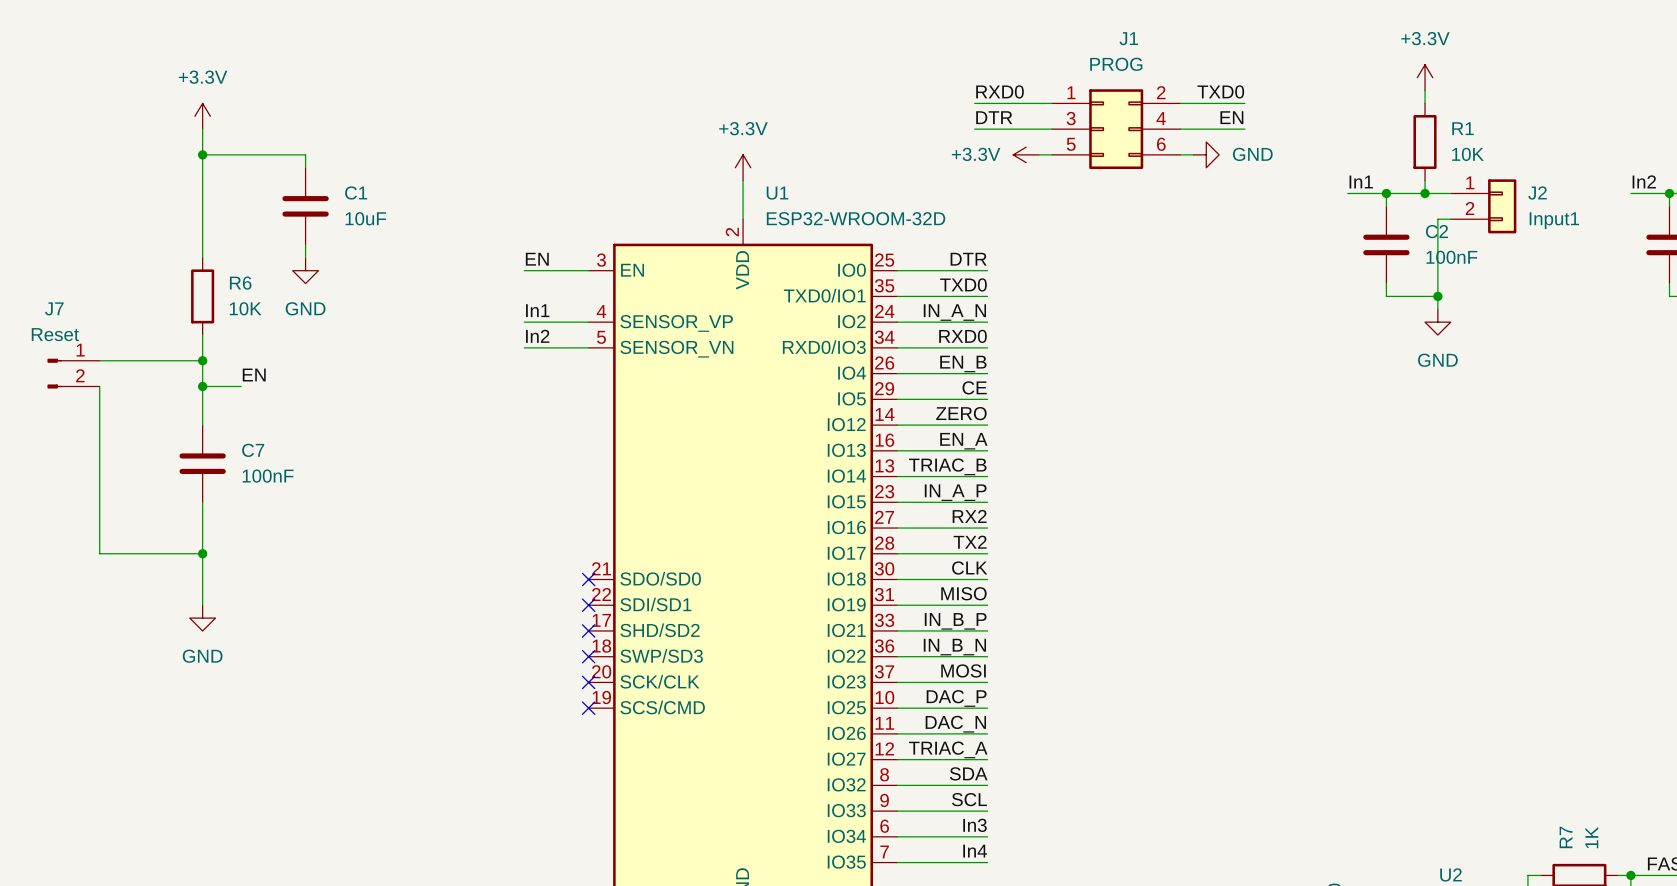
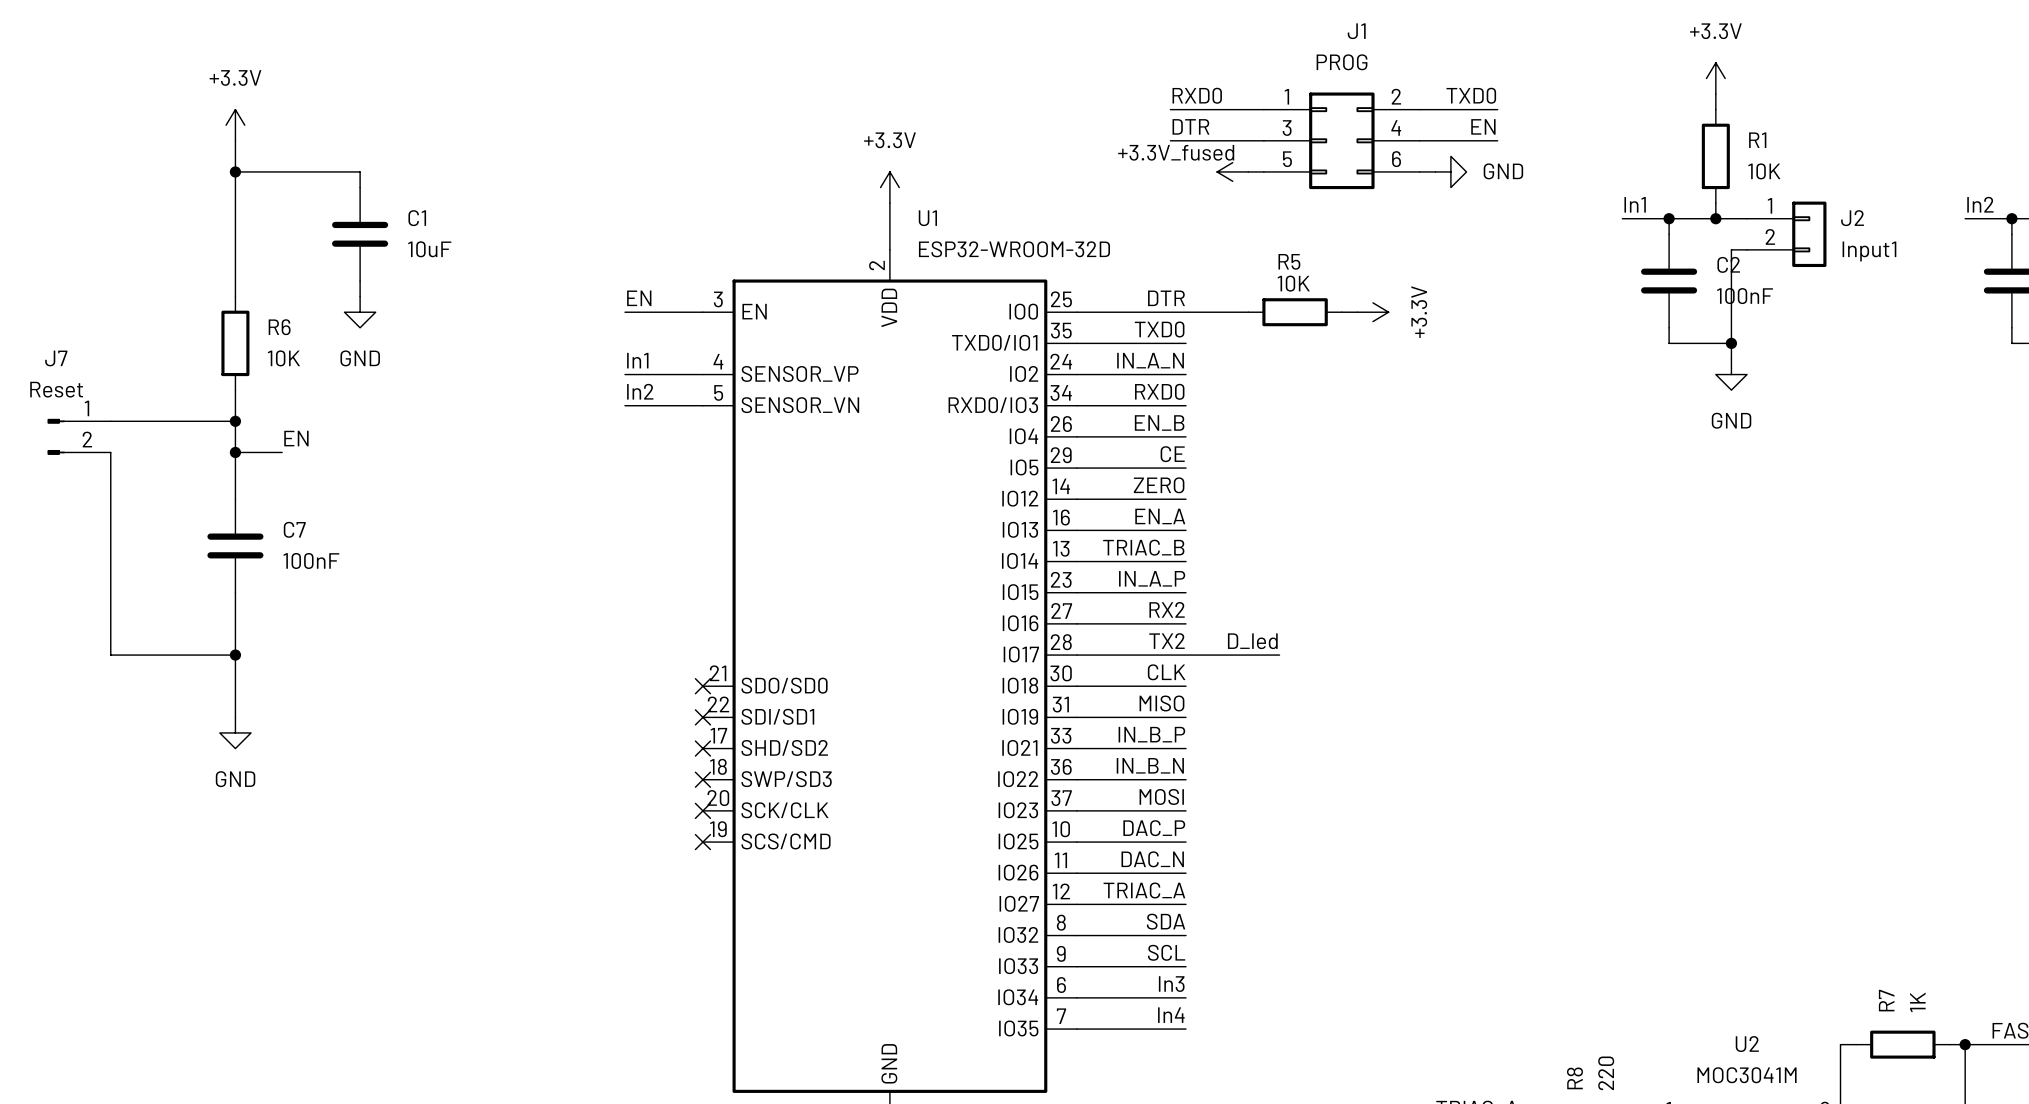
power symbol: +3.3V (1026, 154) -> +3.3V_fused (1232, 171)
wire: none -> (1186, 312) (1248, 312)
R5: none -> 10K (1295, 312)
wire: none -> (1341, 312) (1357, 312)
power symbol: none -> +3.3V (1373, 312)
label: none -> D_led (1252, 641)
wire: none -> (1186, 655) (1279, 655)

